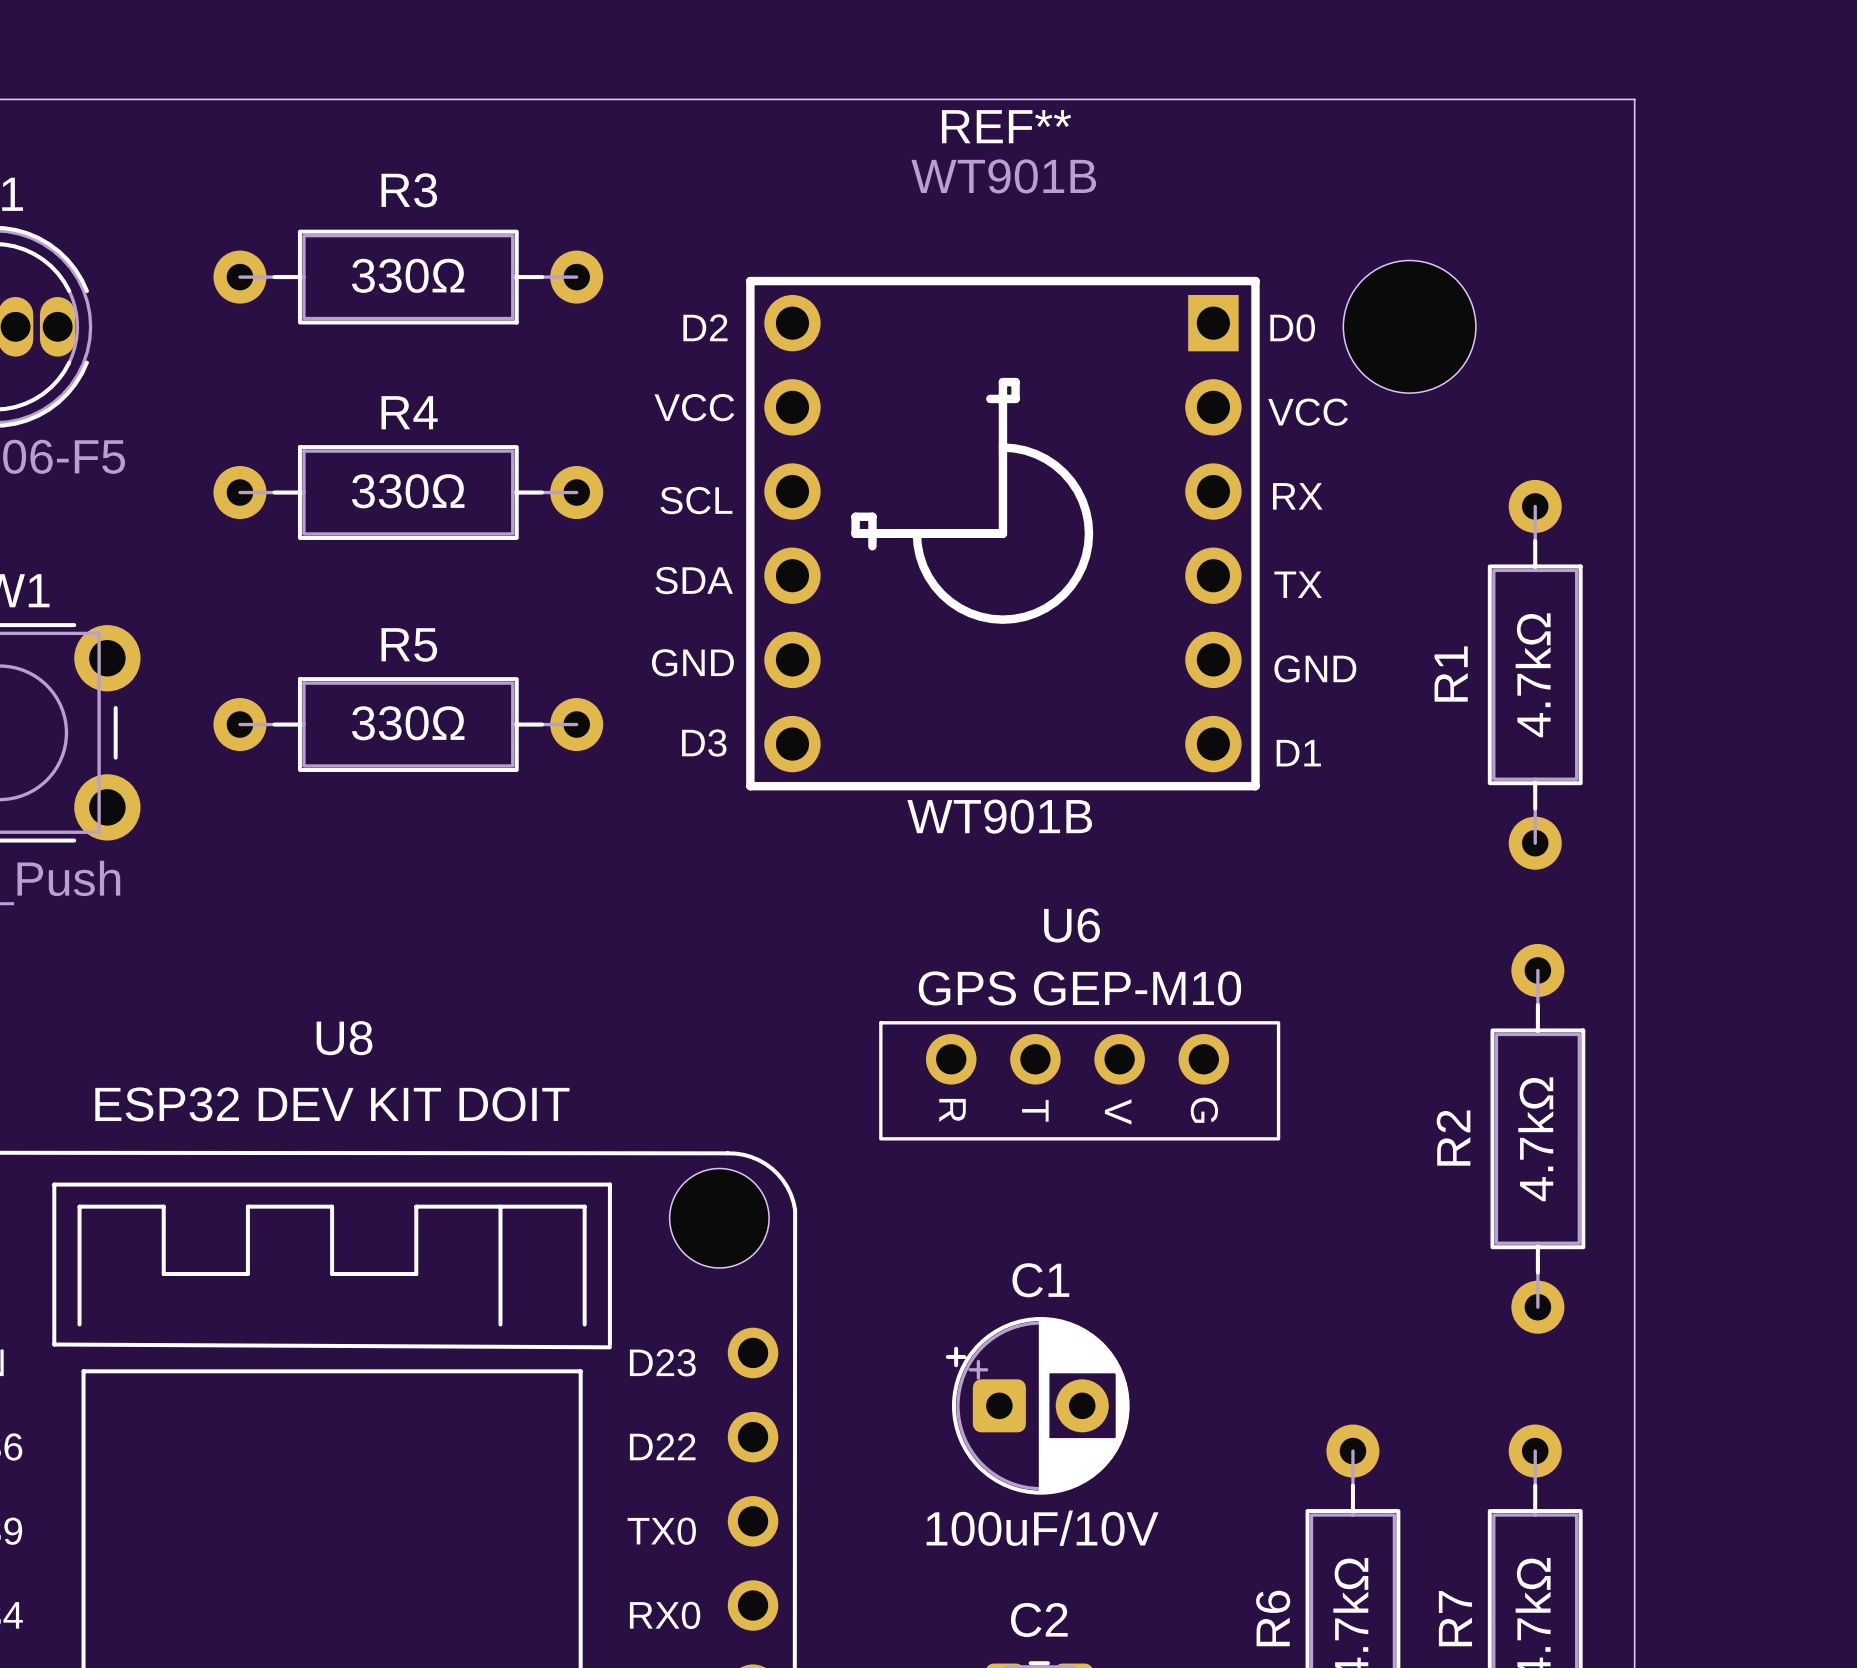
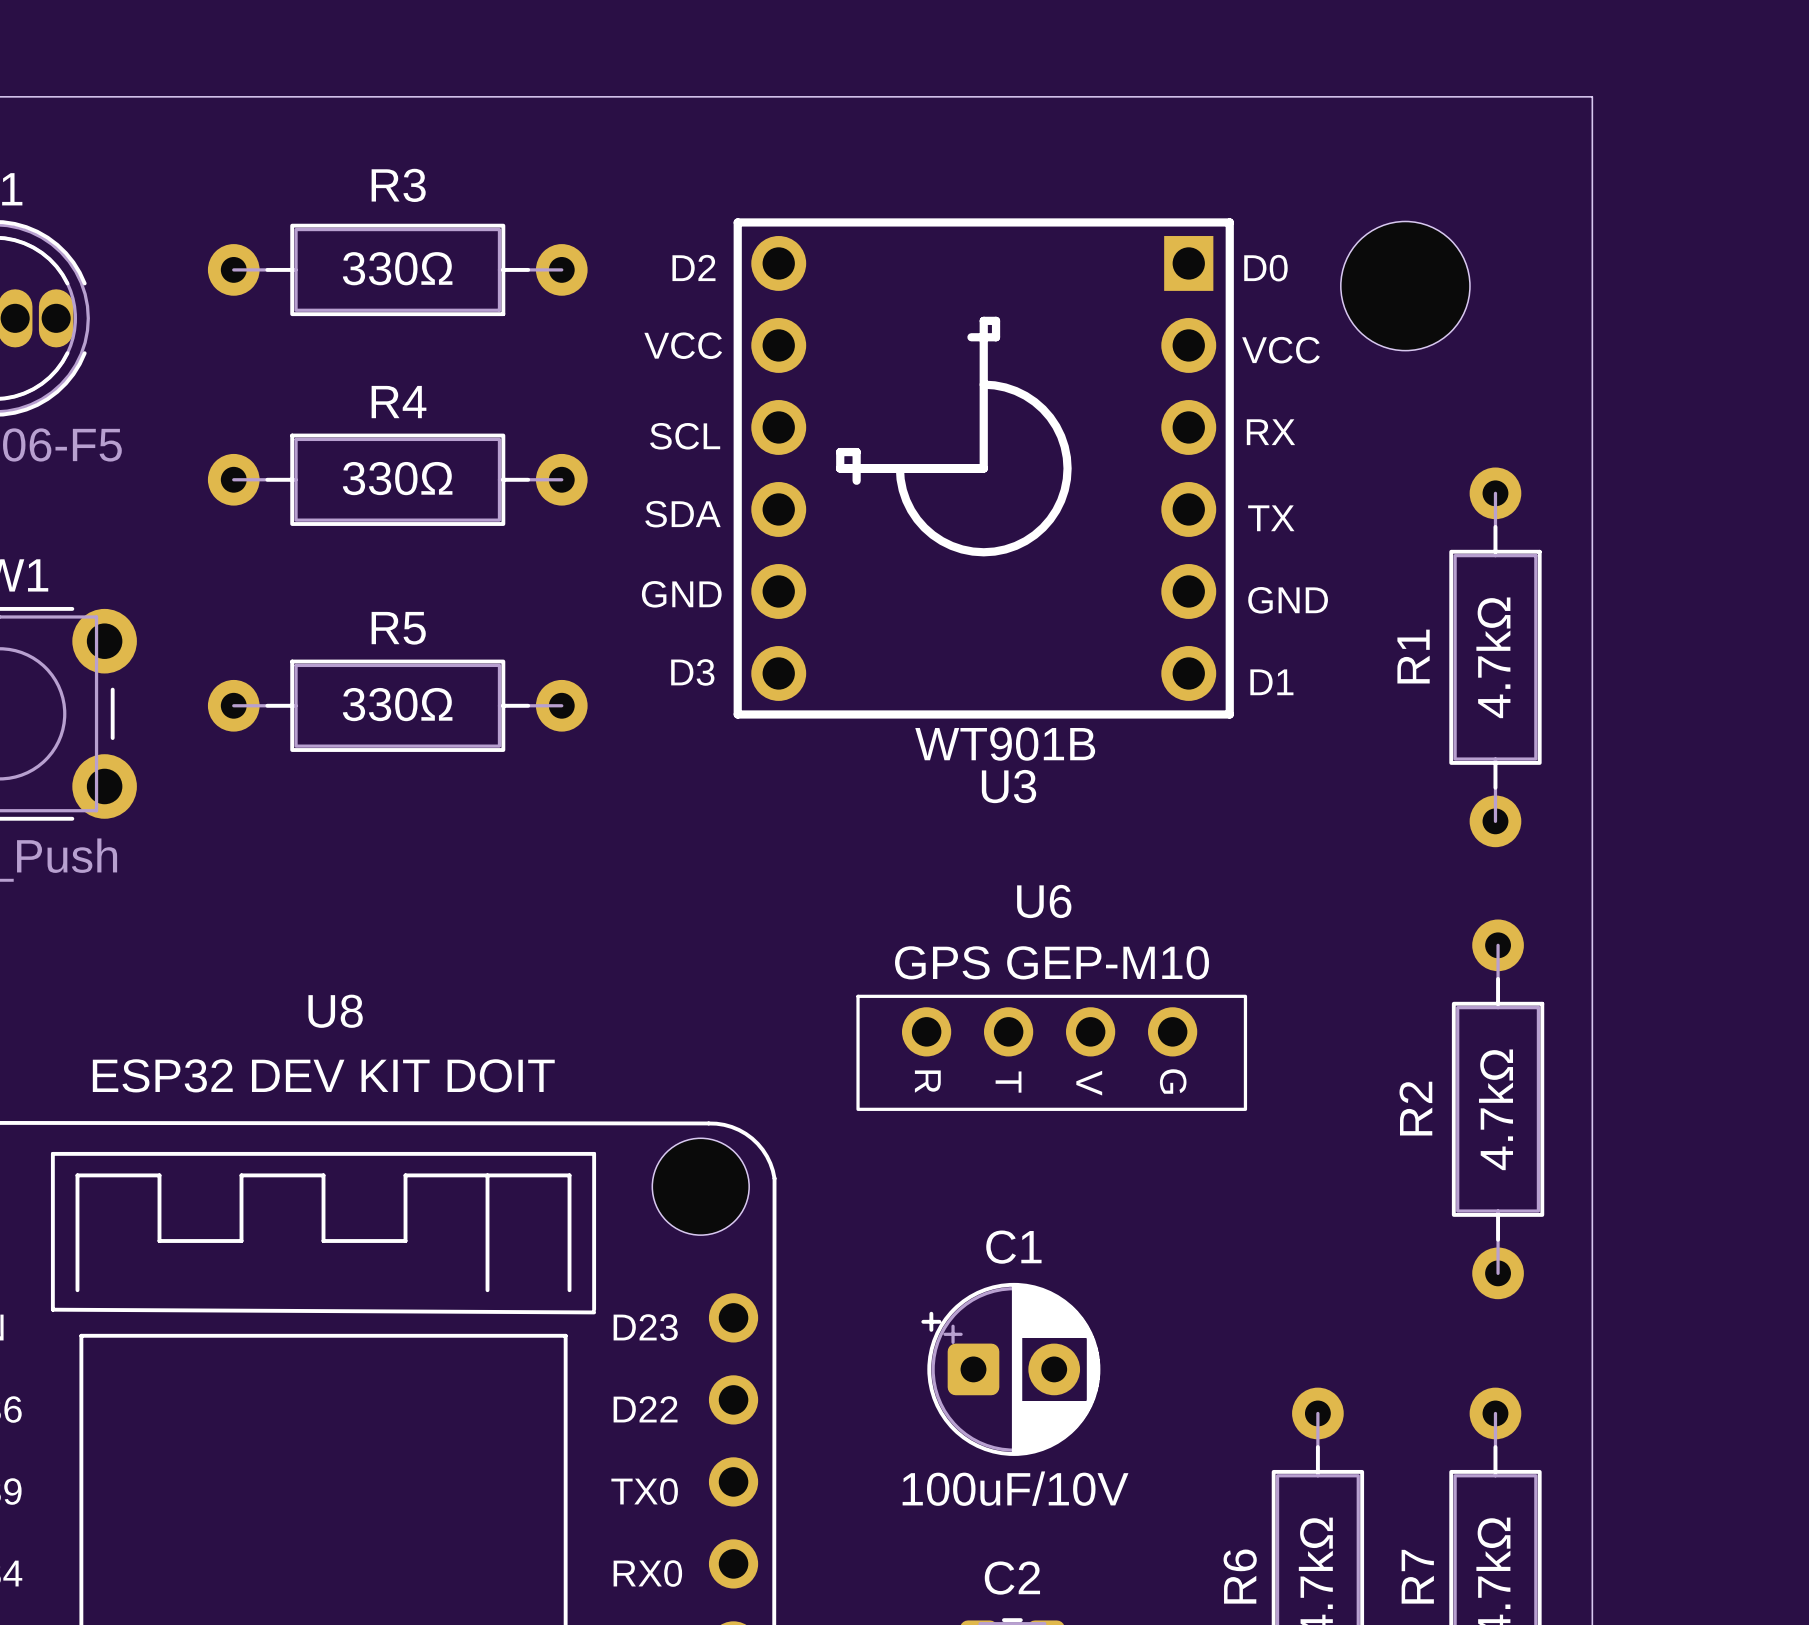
part position: (1409, 326) -> (1405, 286)
U3: none -> (983, 468)
REF**: WT901B (1002, 533) -> none

